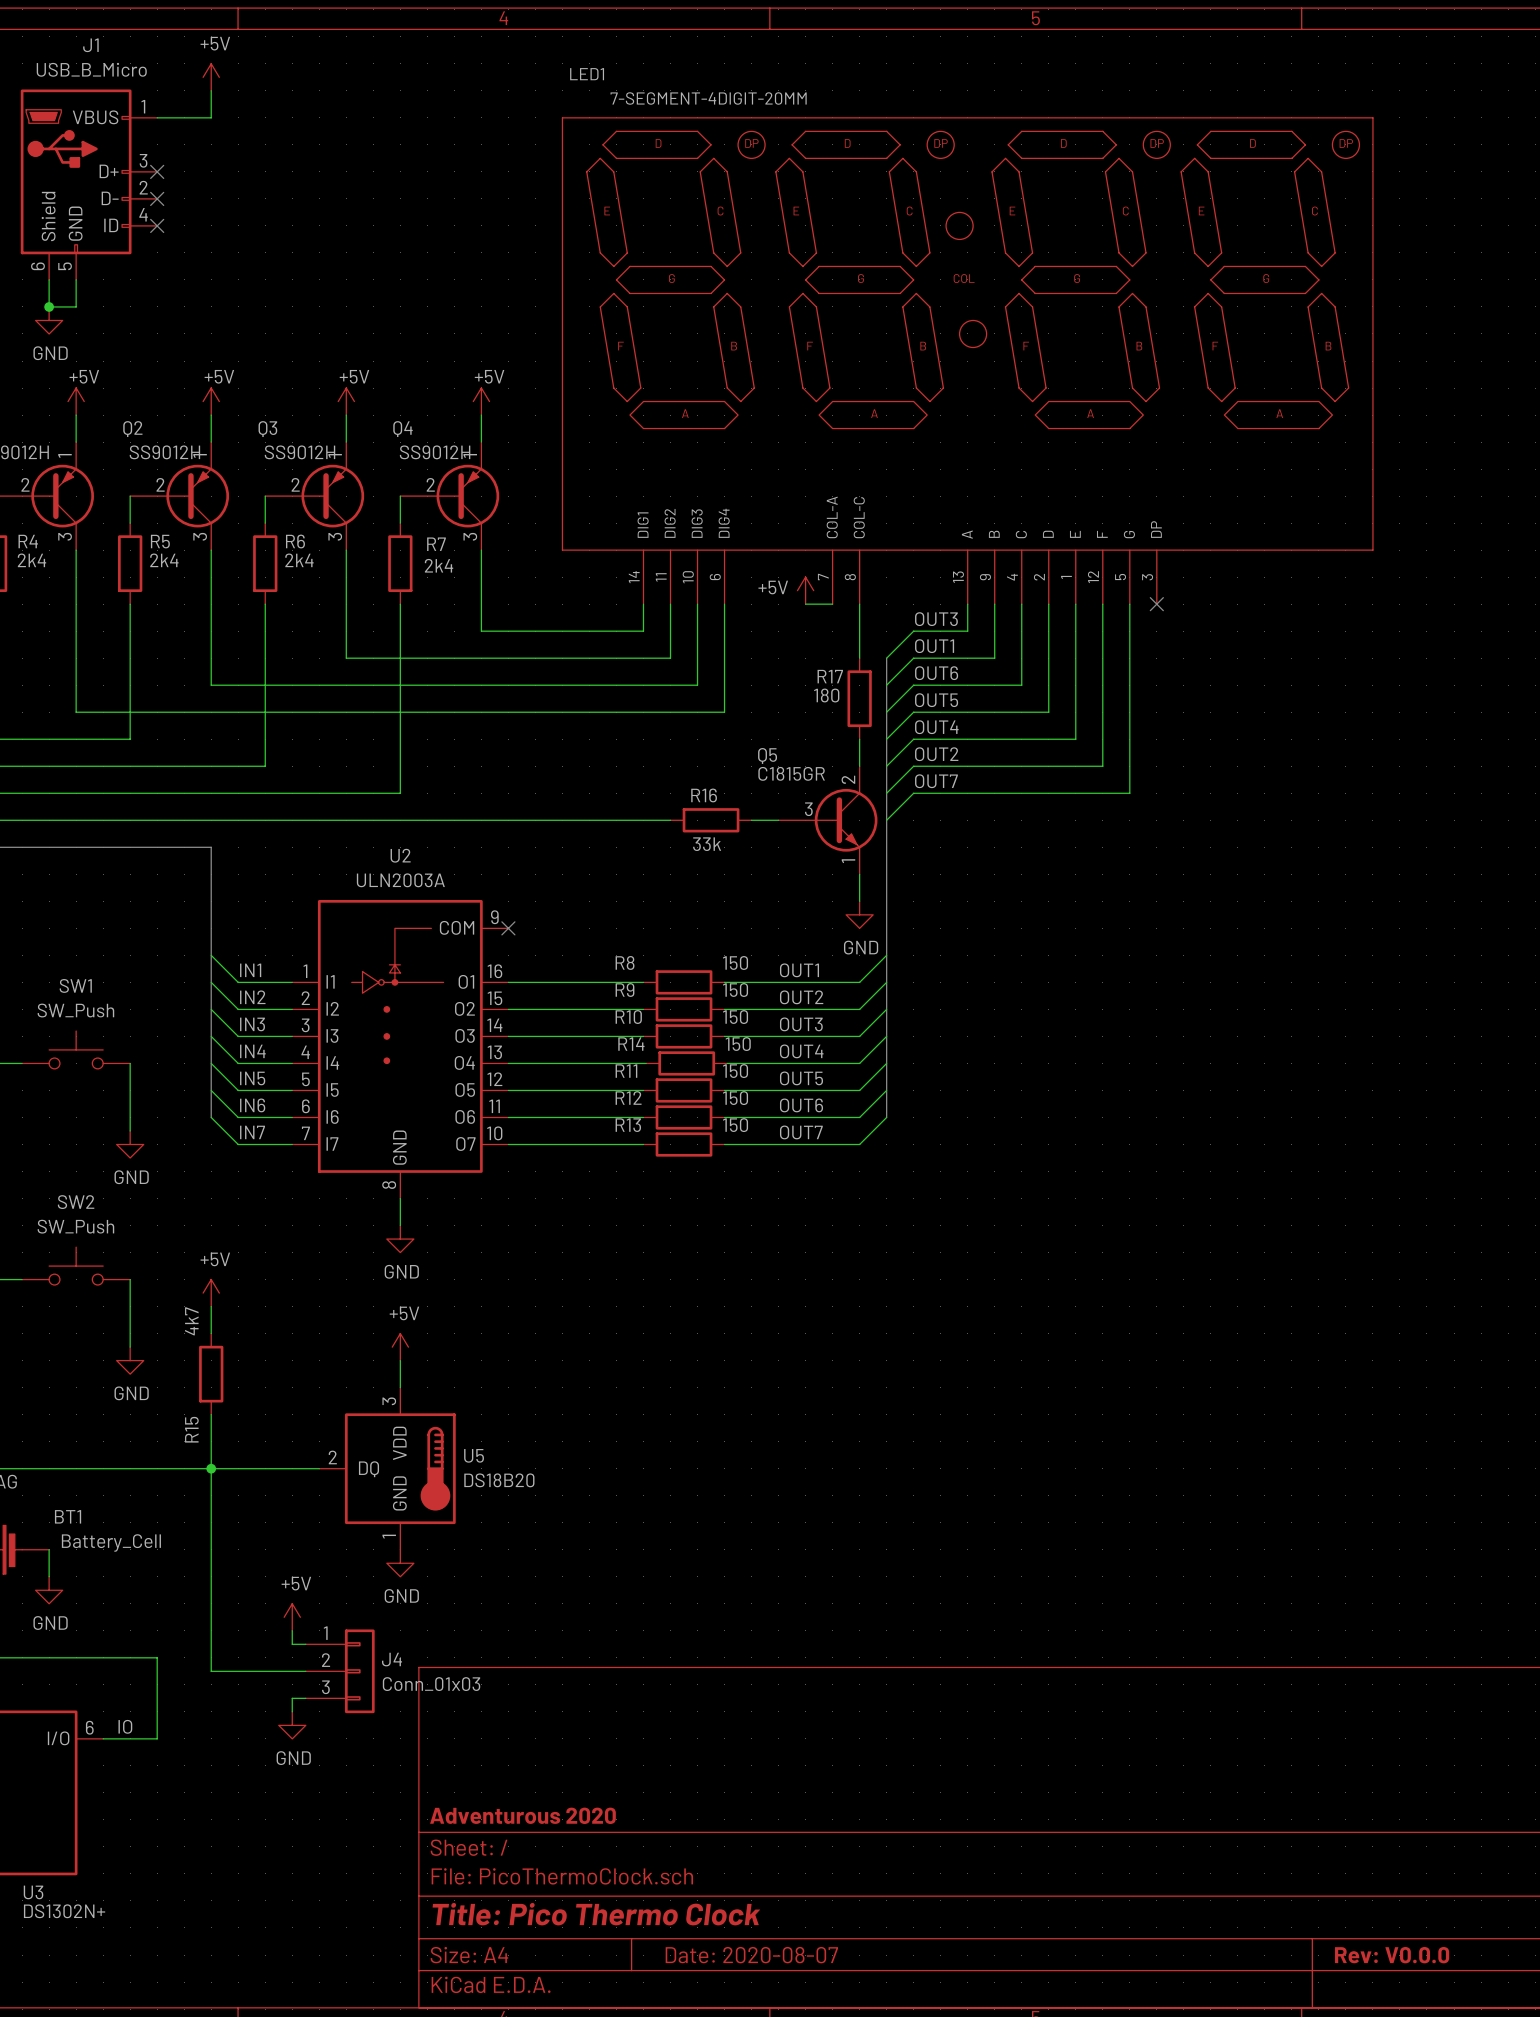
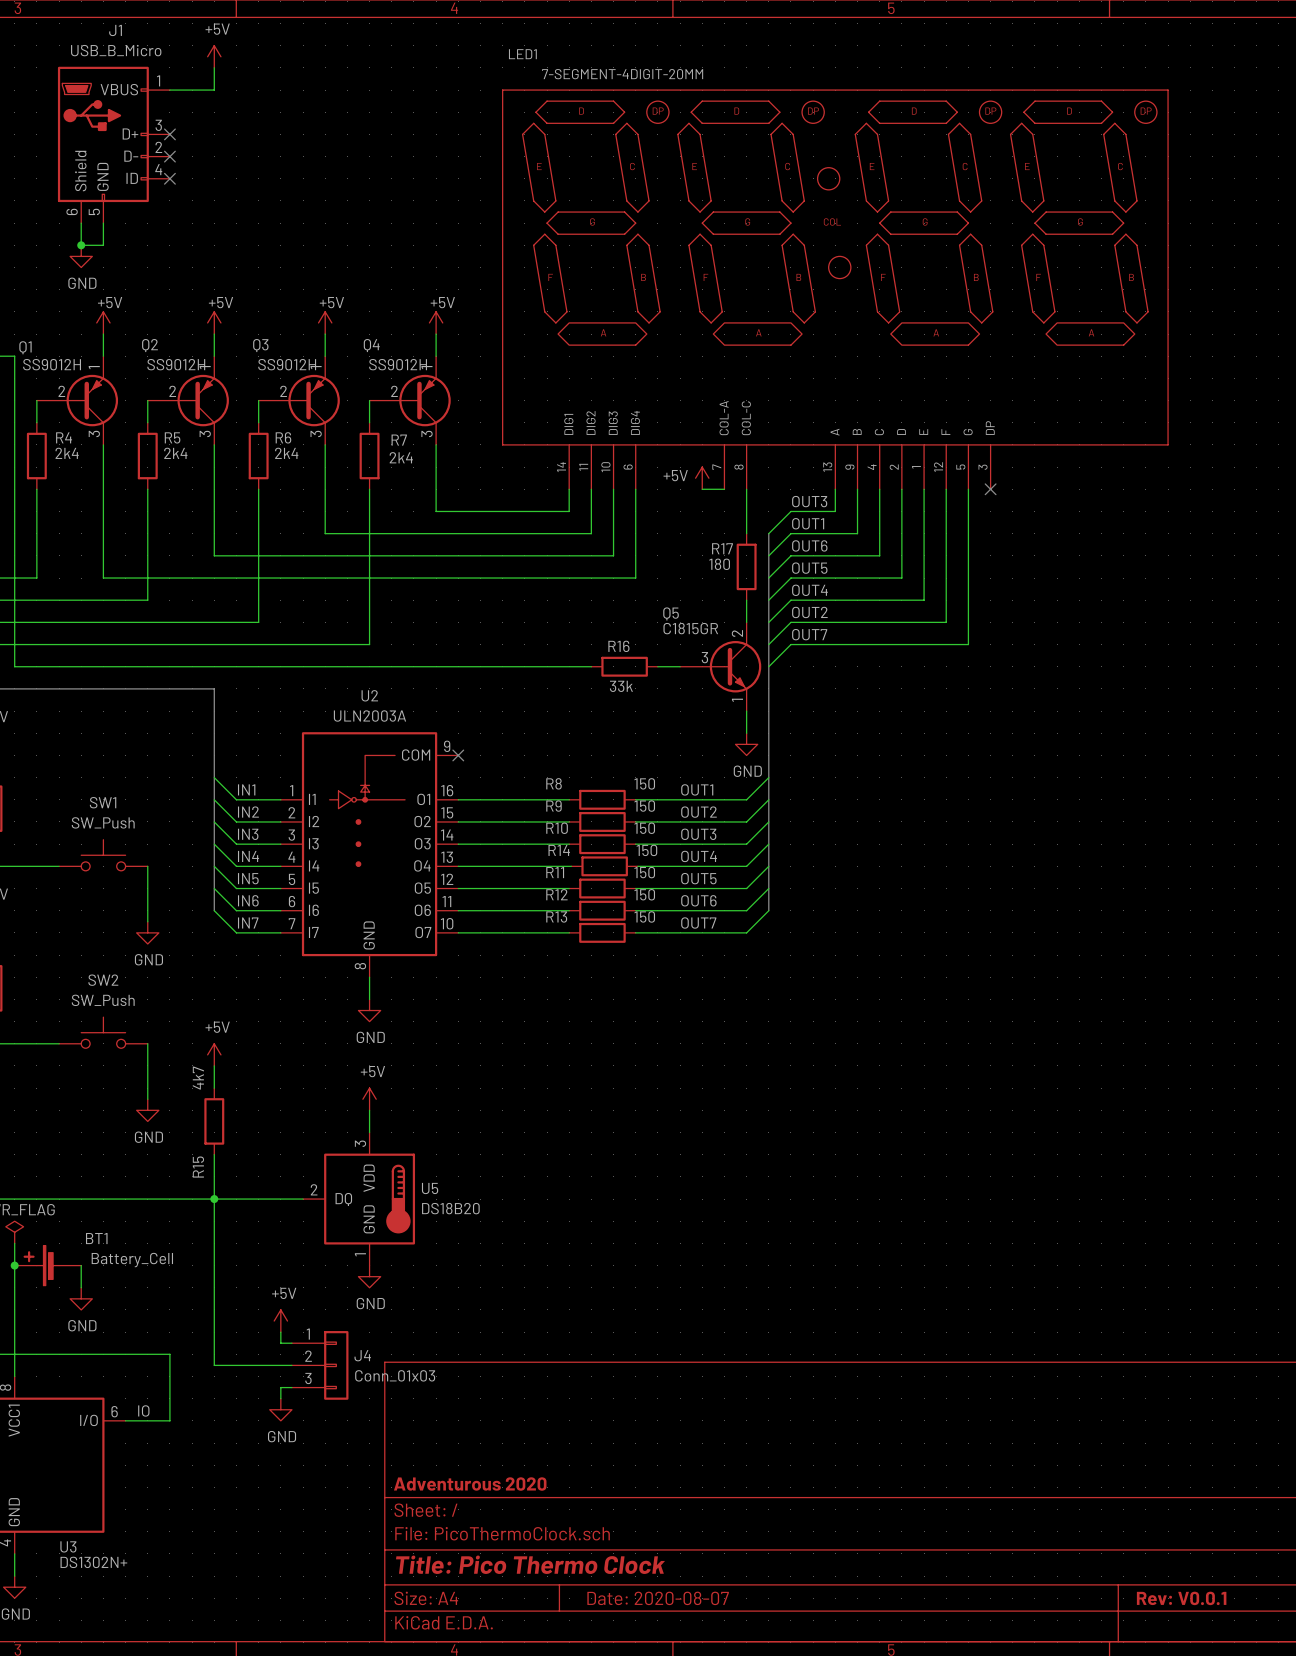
title block: Rev: V0.0.0 (1392, 1955) -> Rev: V0.0.1 (1181, 1598)

